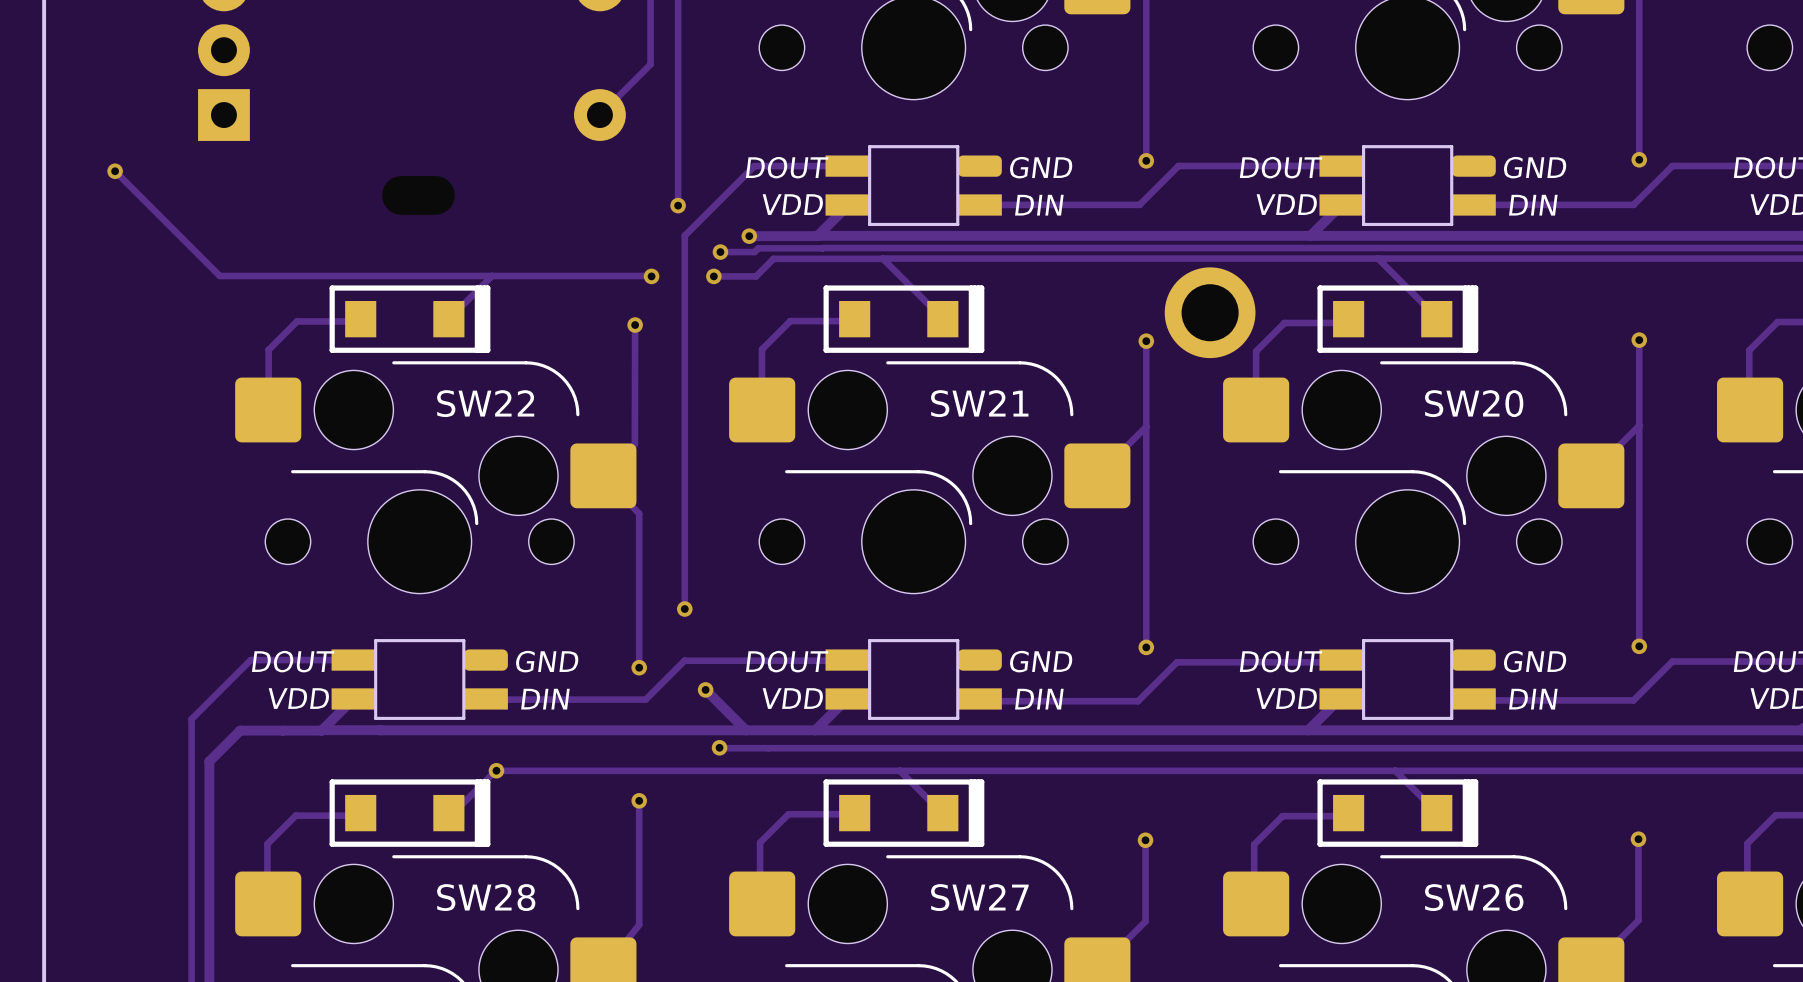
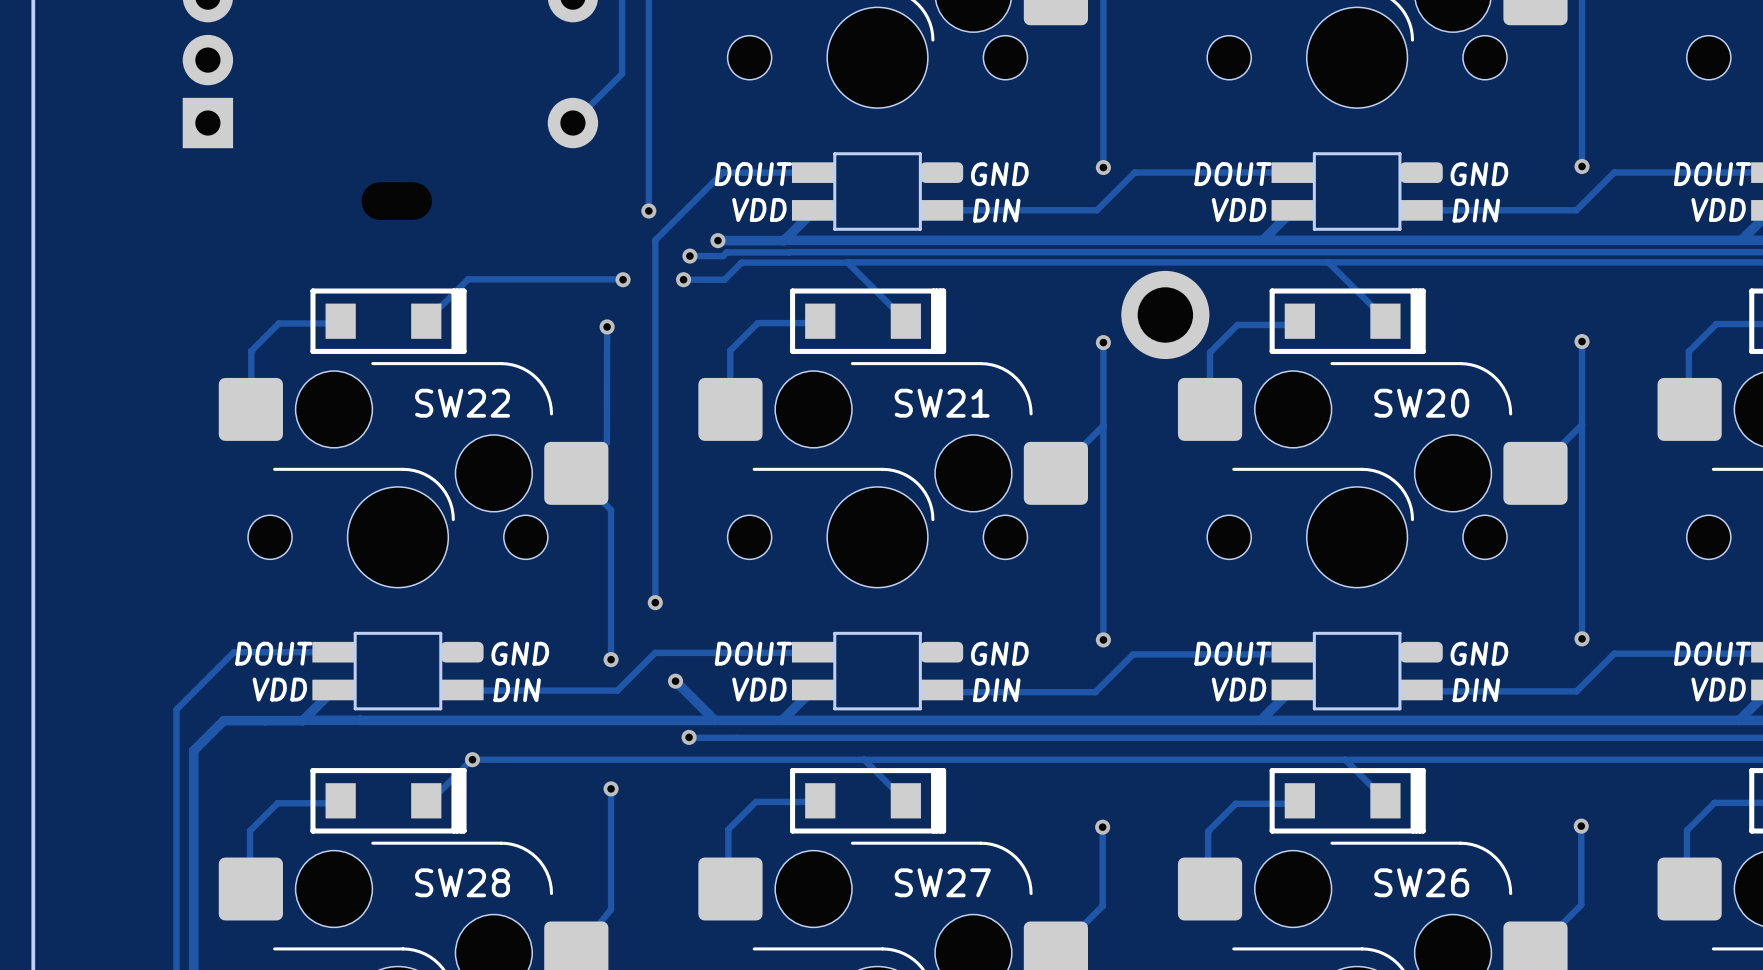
track: (115, 171) (219, 276) (492, 276) -> none
via: (115, 171) -> none

